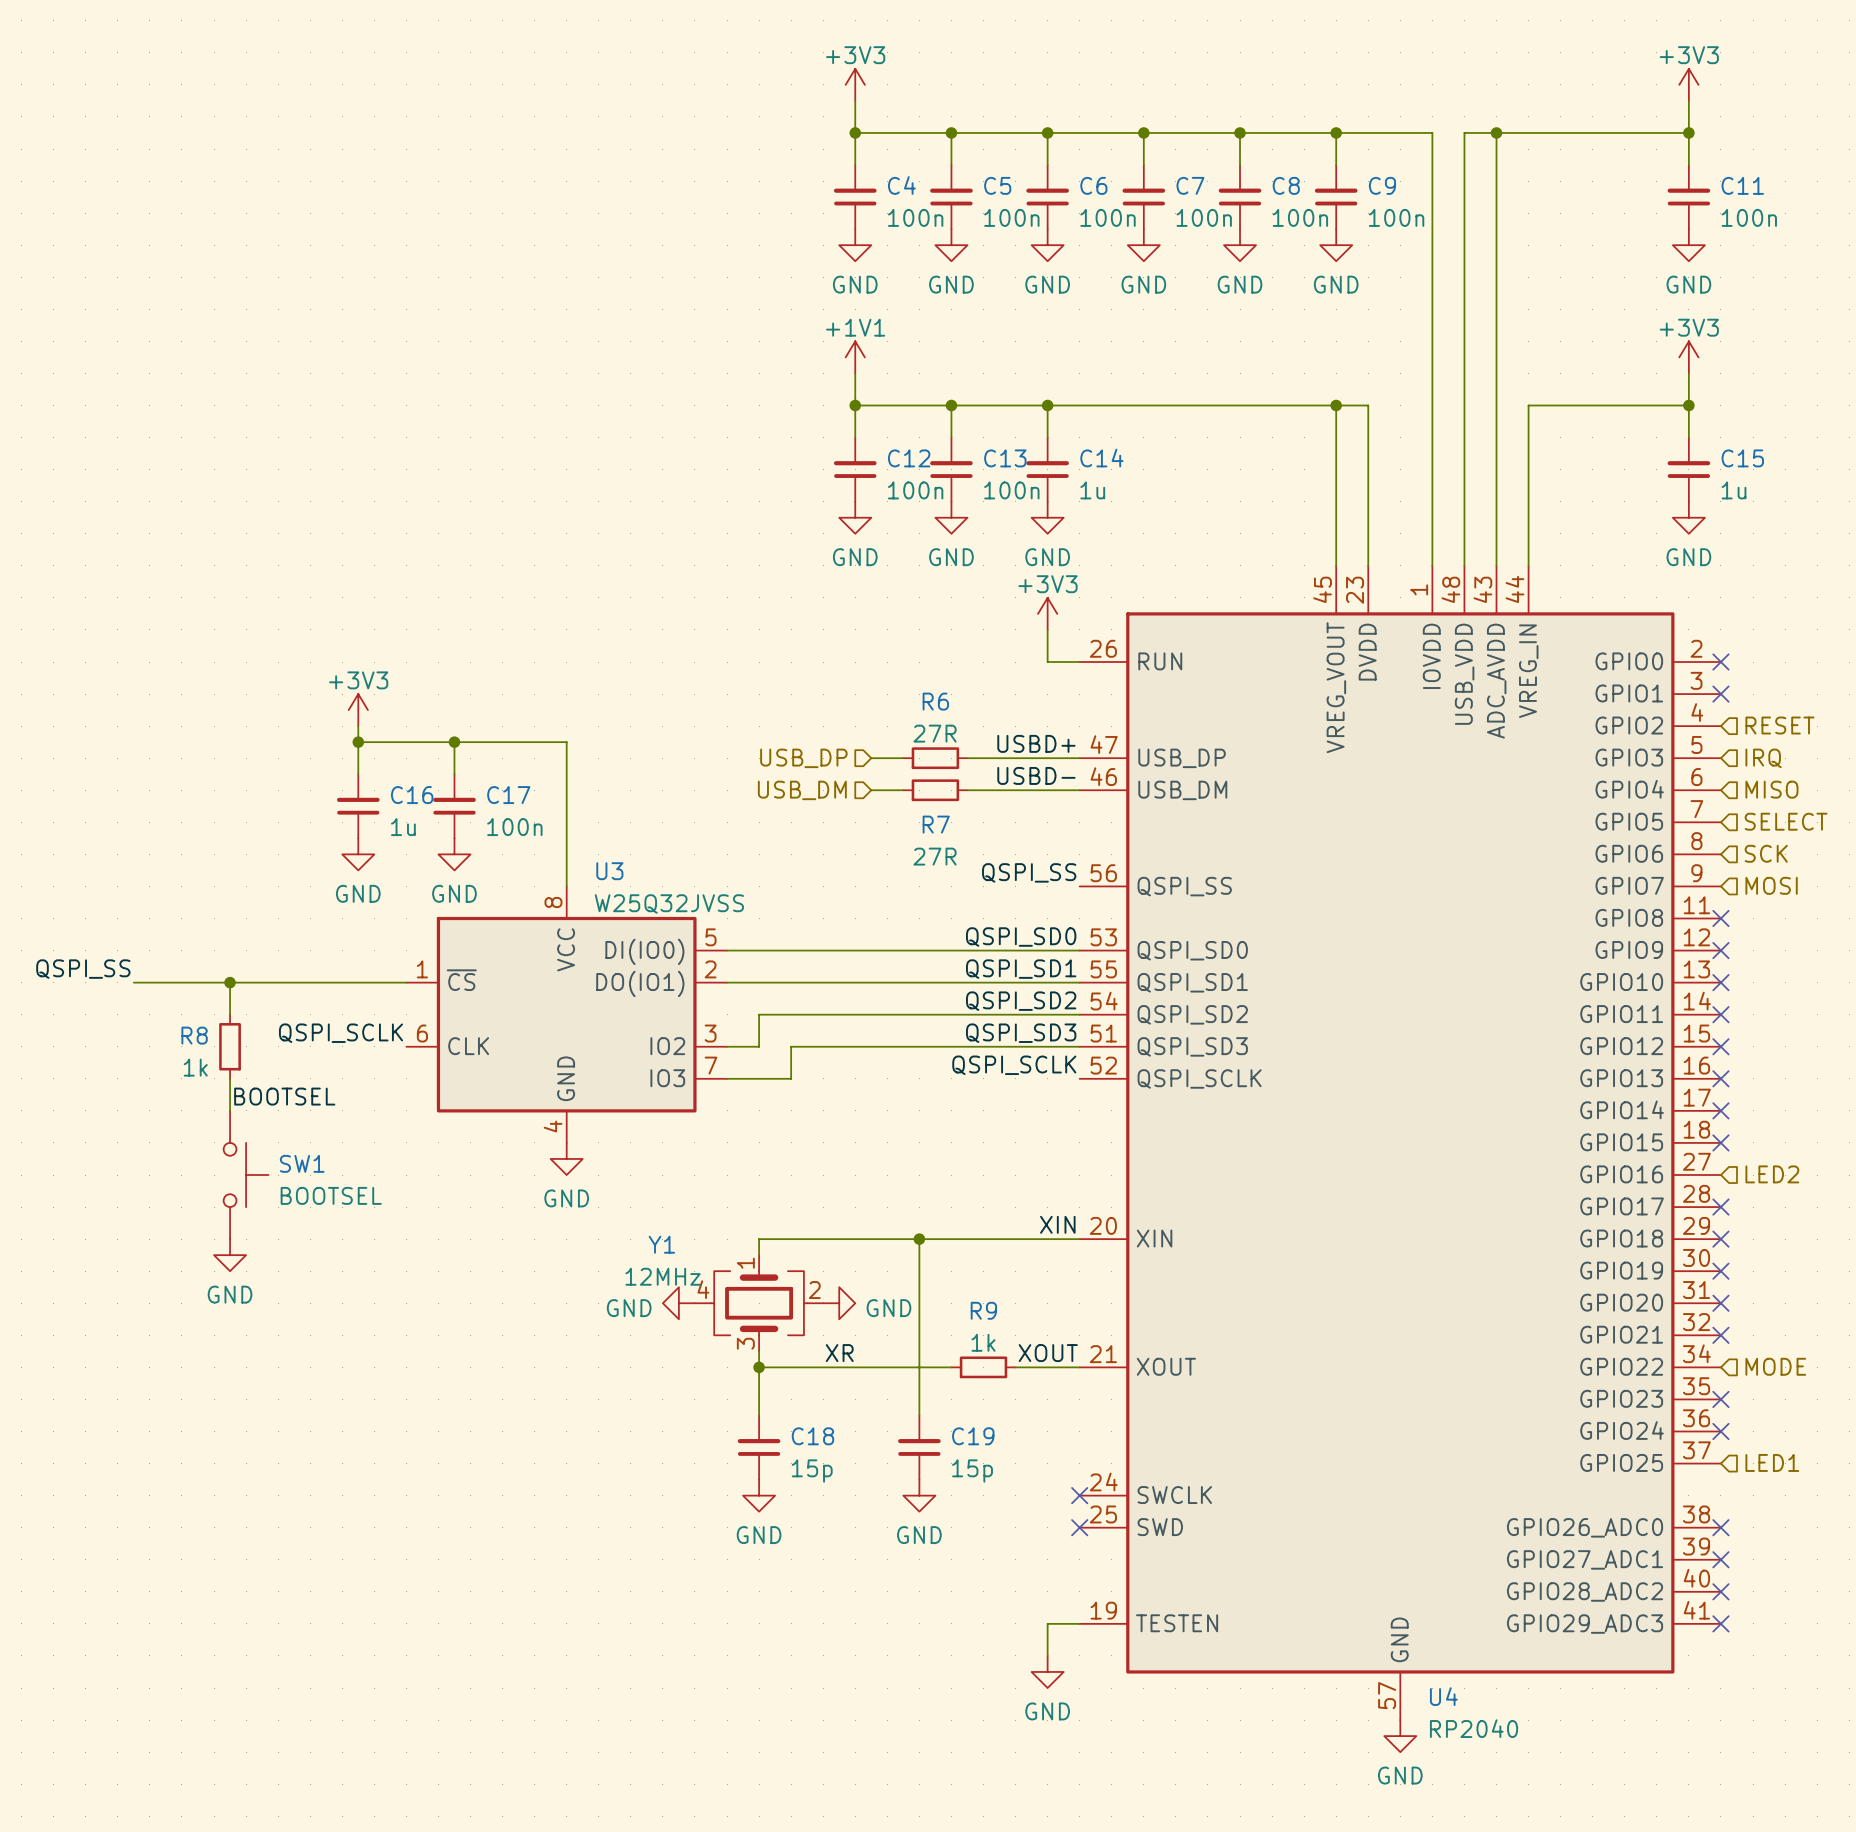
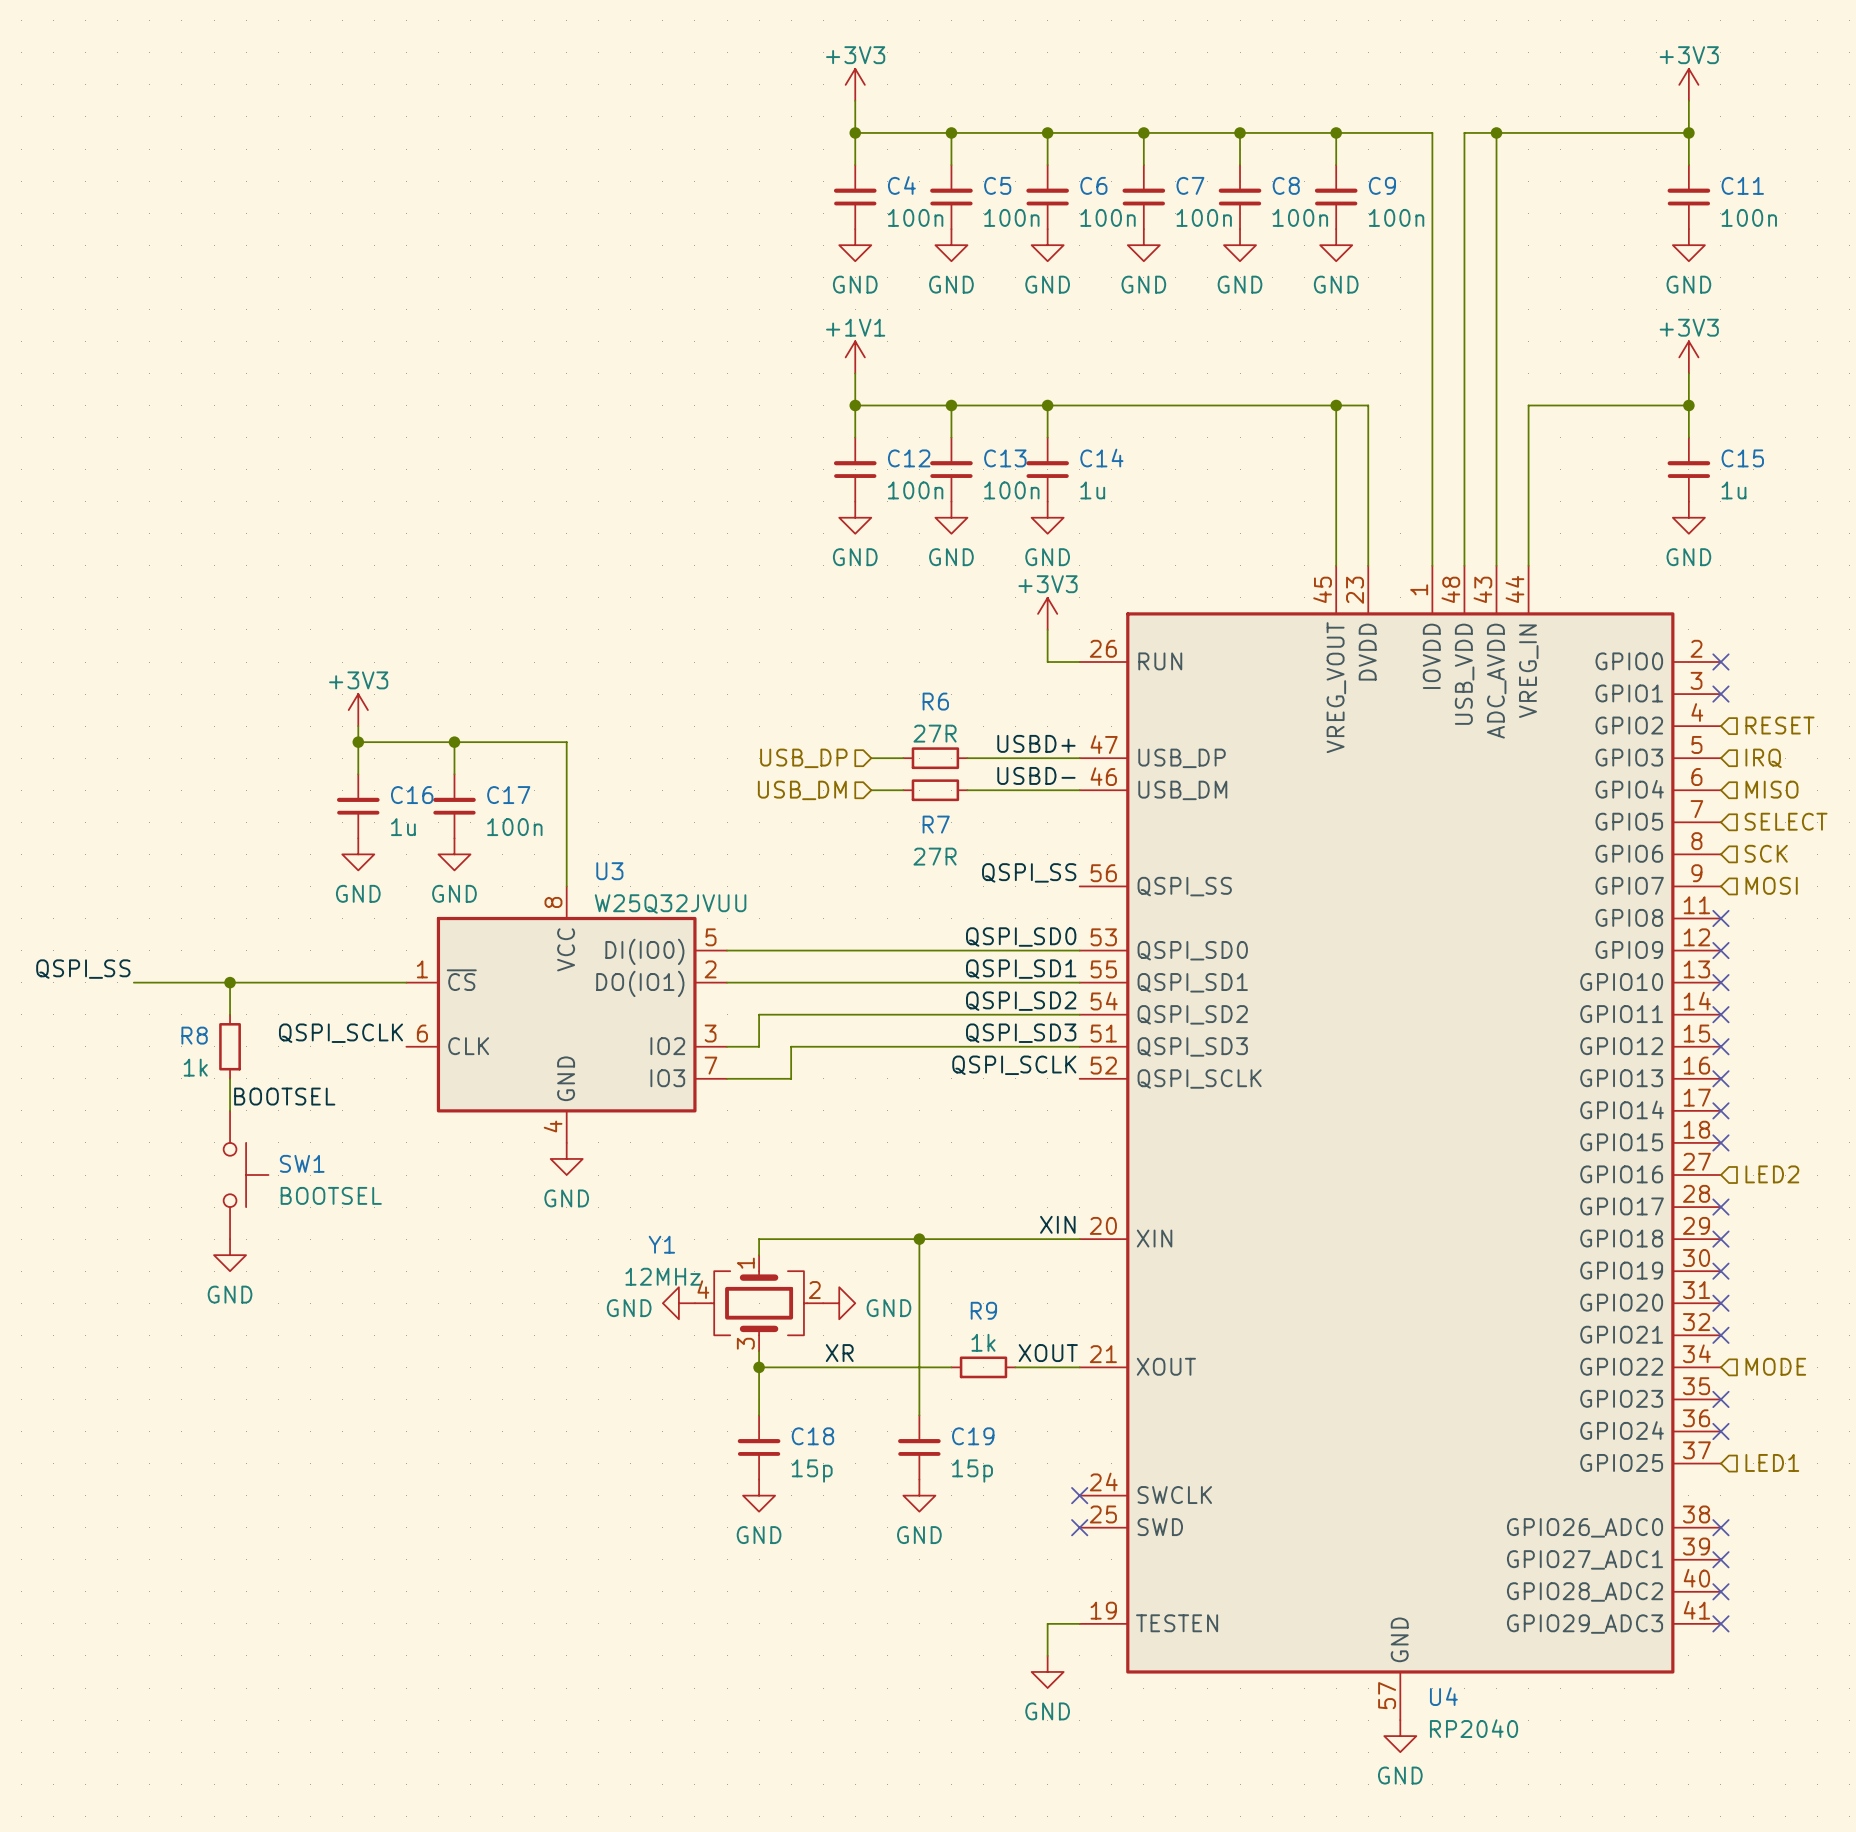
U3 value: W25Q32JVSS (669, 903) -> W25Q32JVUU (670, 903)

